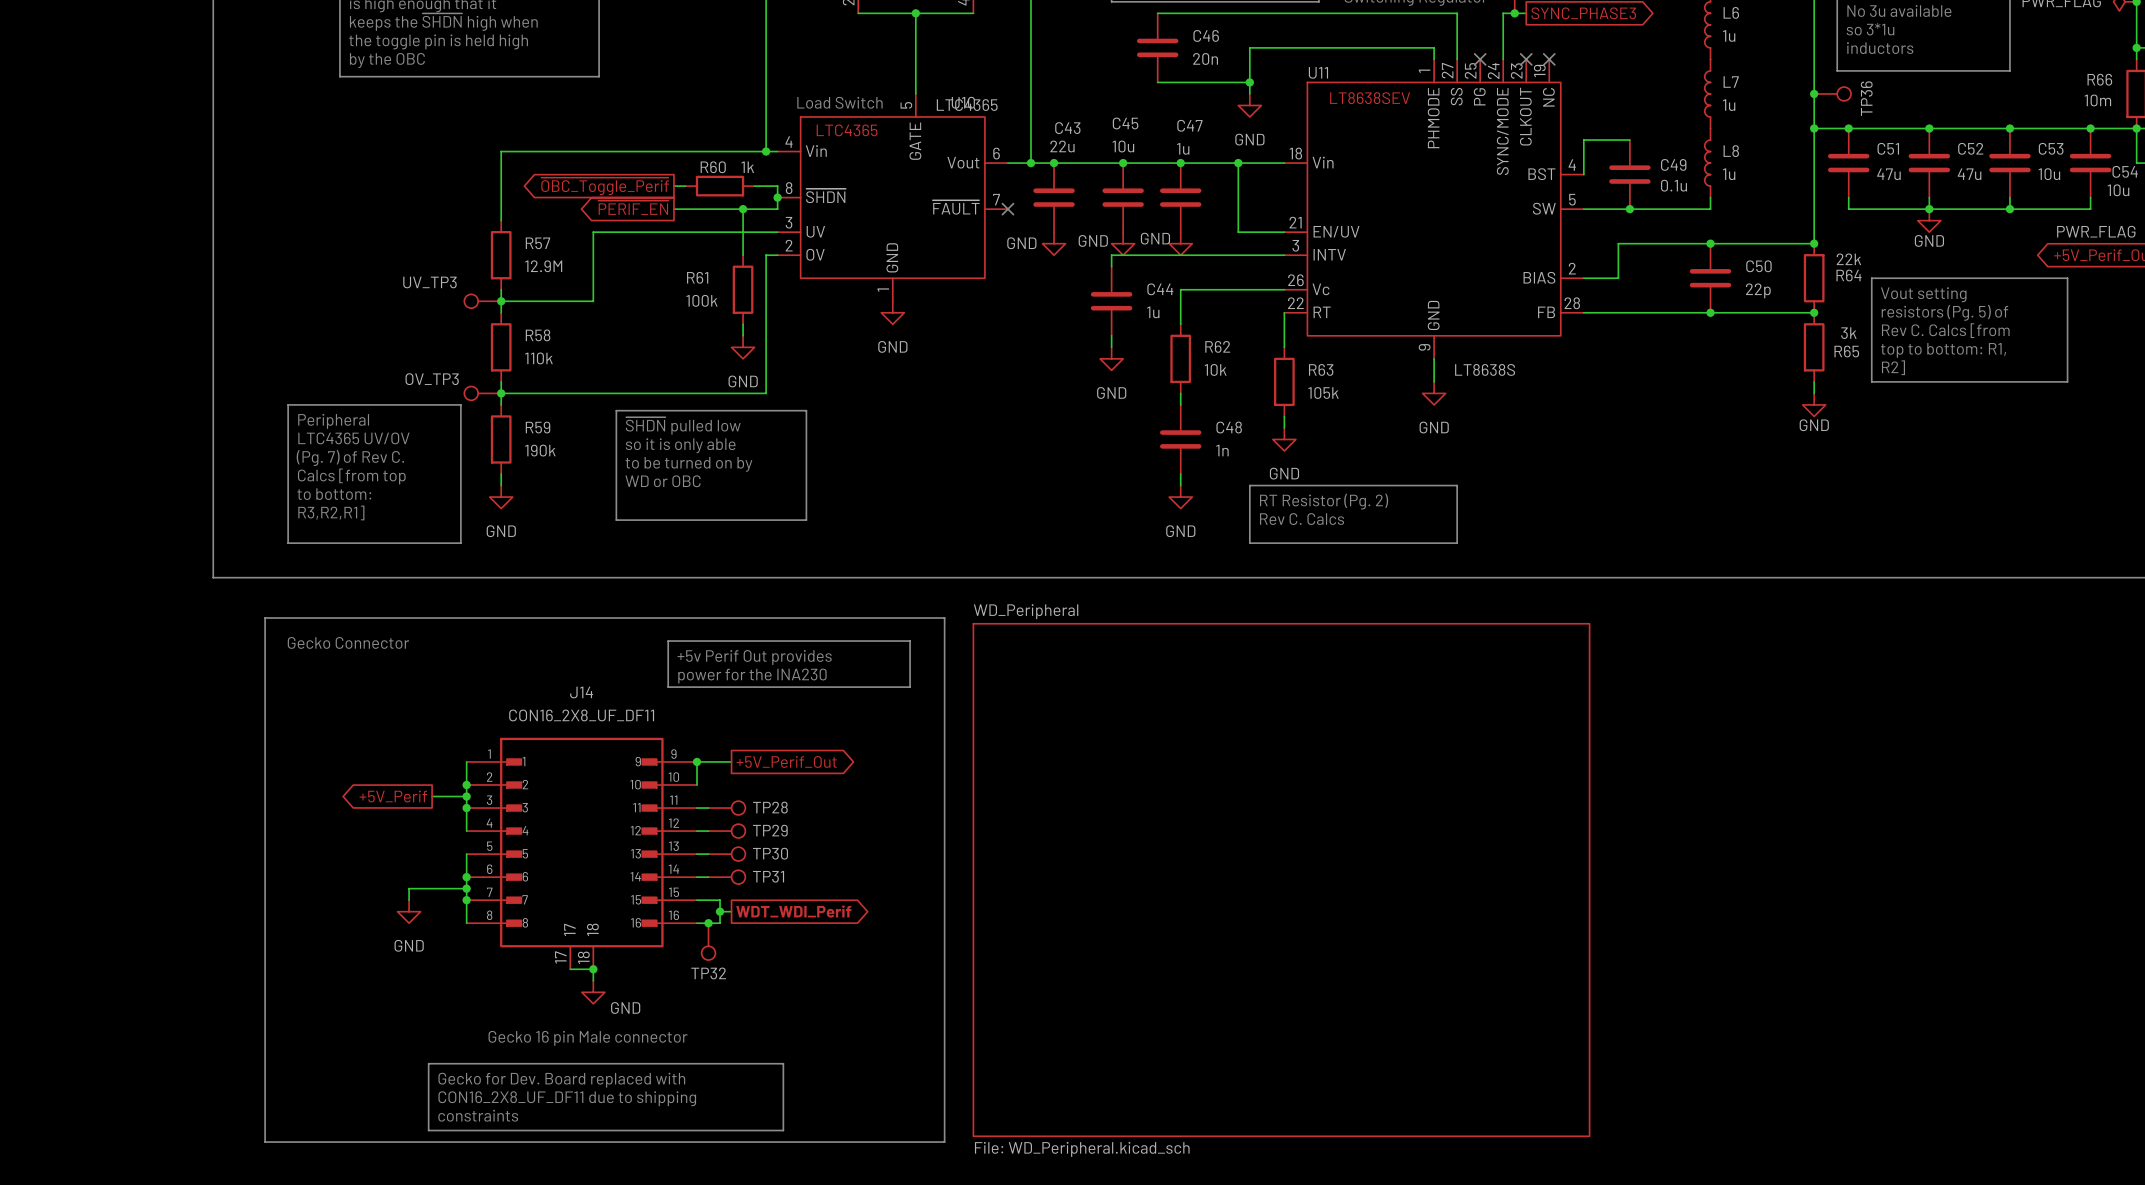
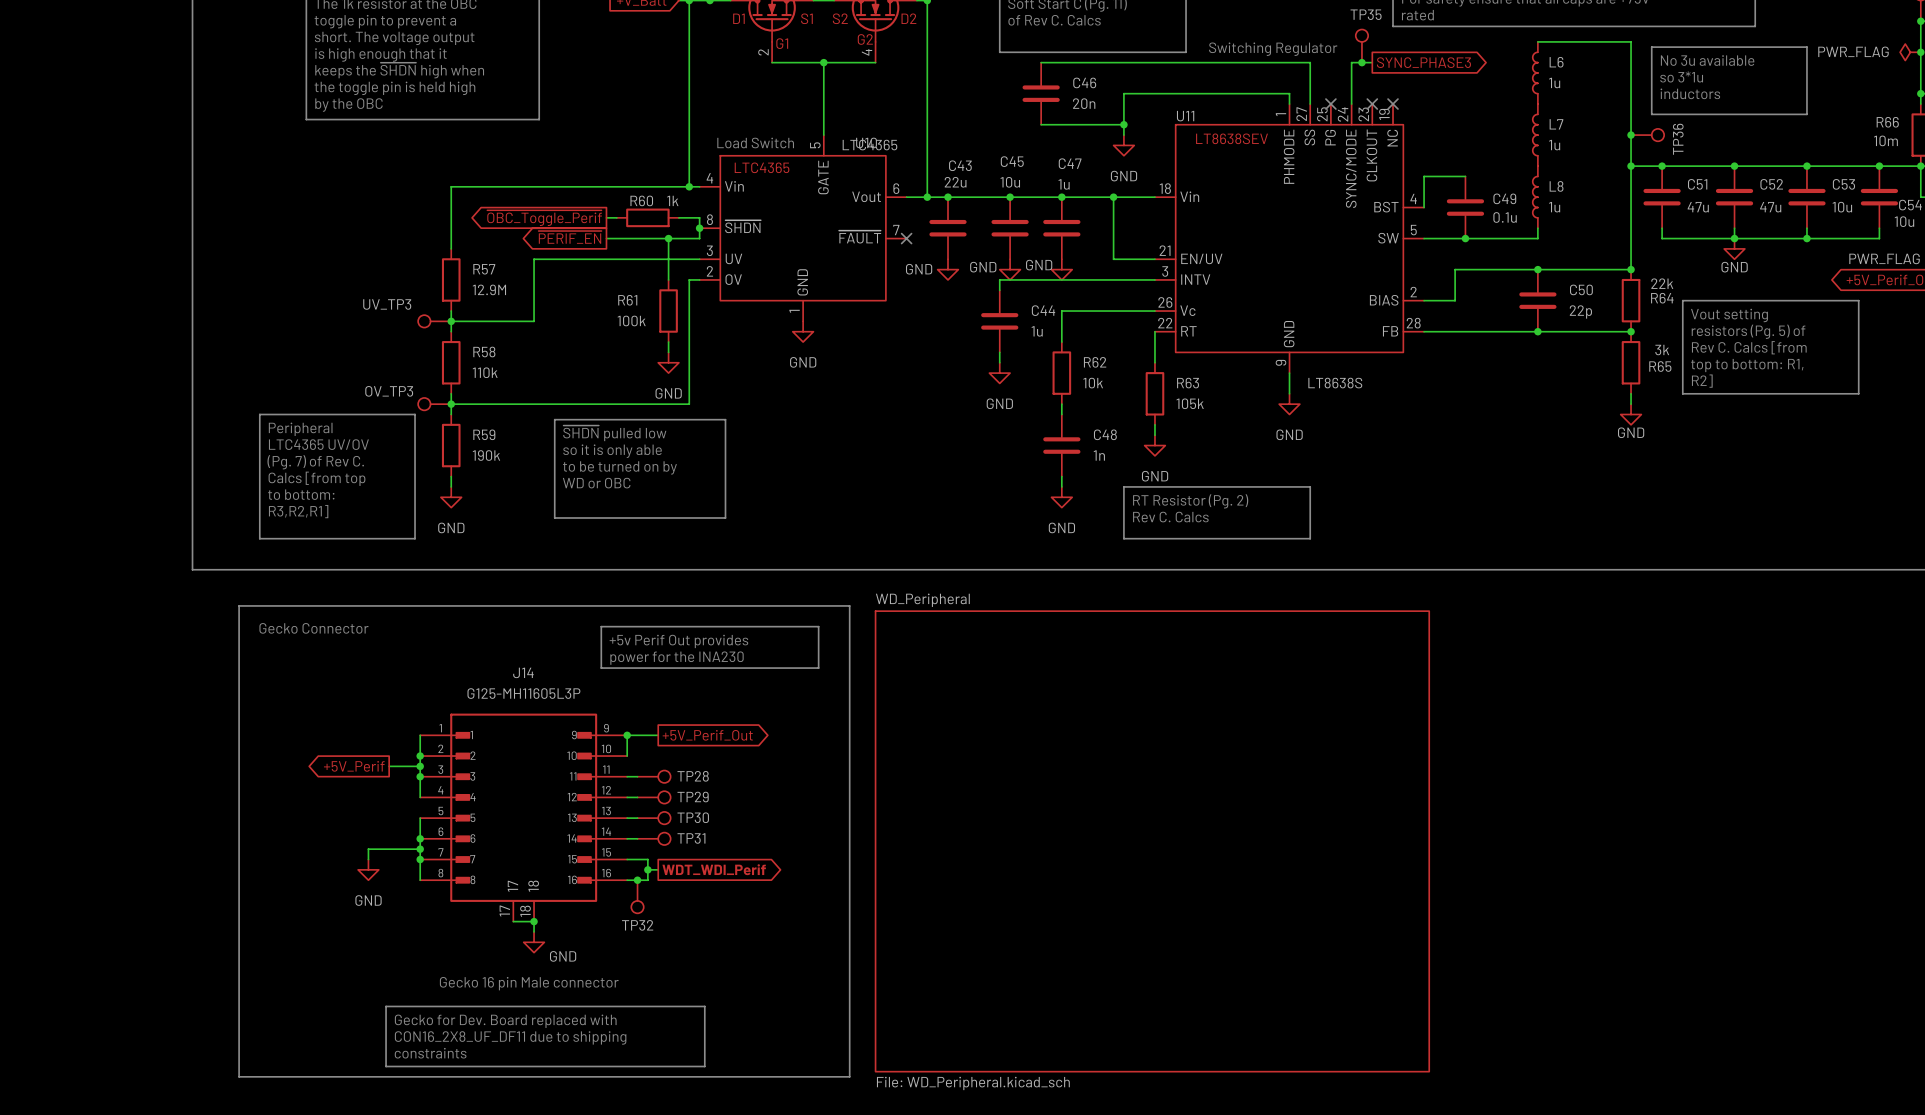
J14 value: CON16_2X8_UF_DF11 (581, 715) -> G125-MH11605L3P (523, 693)

